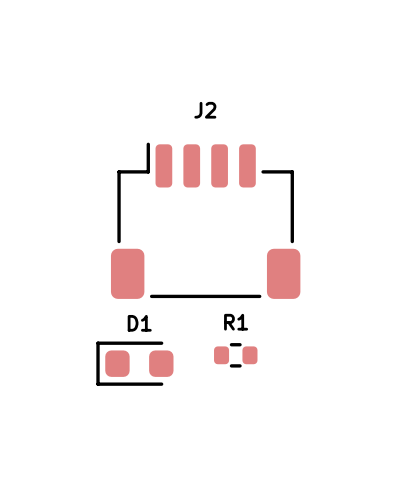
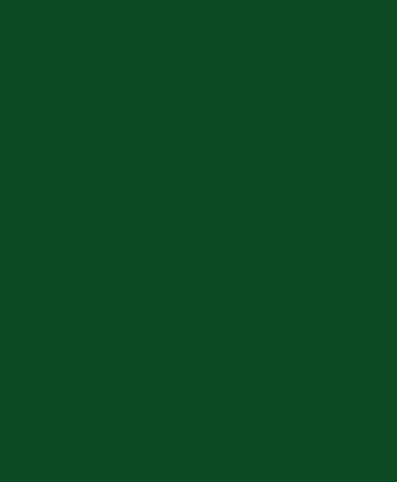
J2: (205, 220) -> none
R1: (235, 355) -> none
D1: (134, 363) -> none

